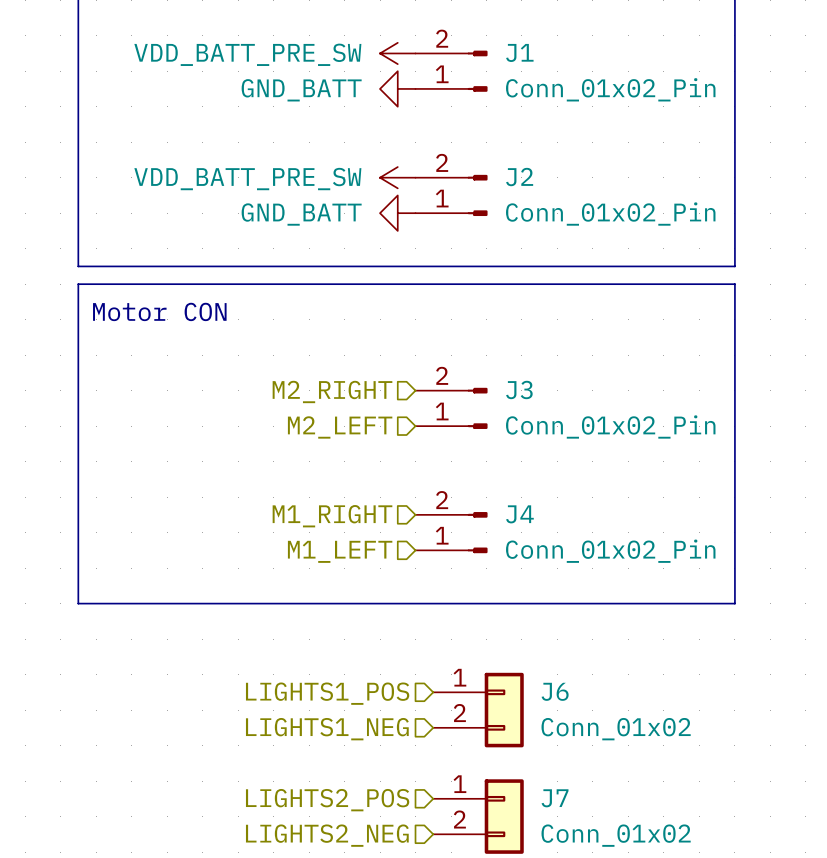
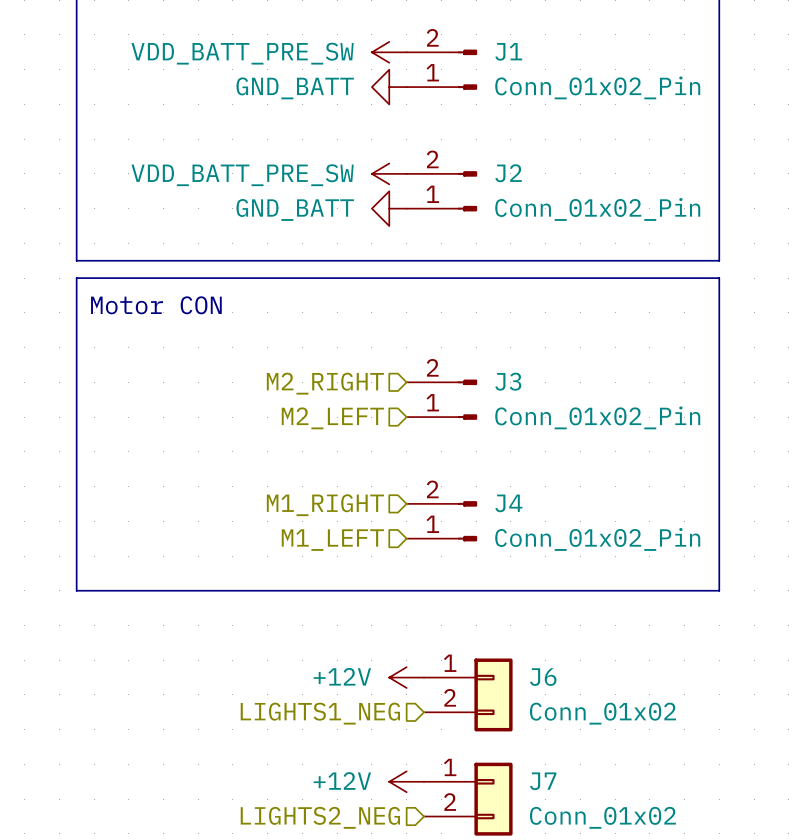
power symbol: none -> +12V (406, 677)
hierarchical label: LIGHTS1_POS (327, 693) -> none
power symbol: none -> +12V (406, 781)
hierarchical label: LIGHTS2_POS (327, 800) -> none

